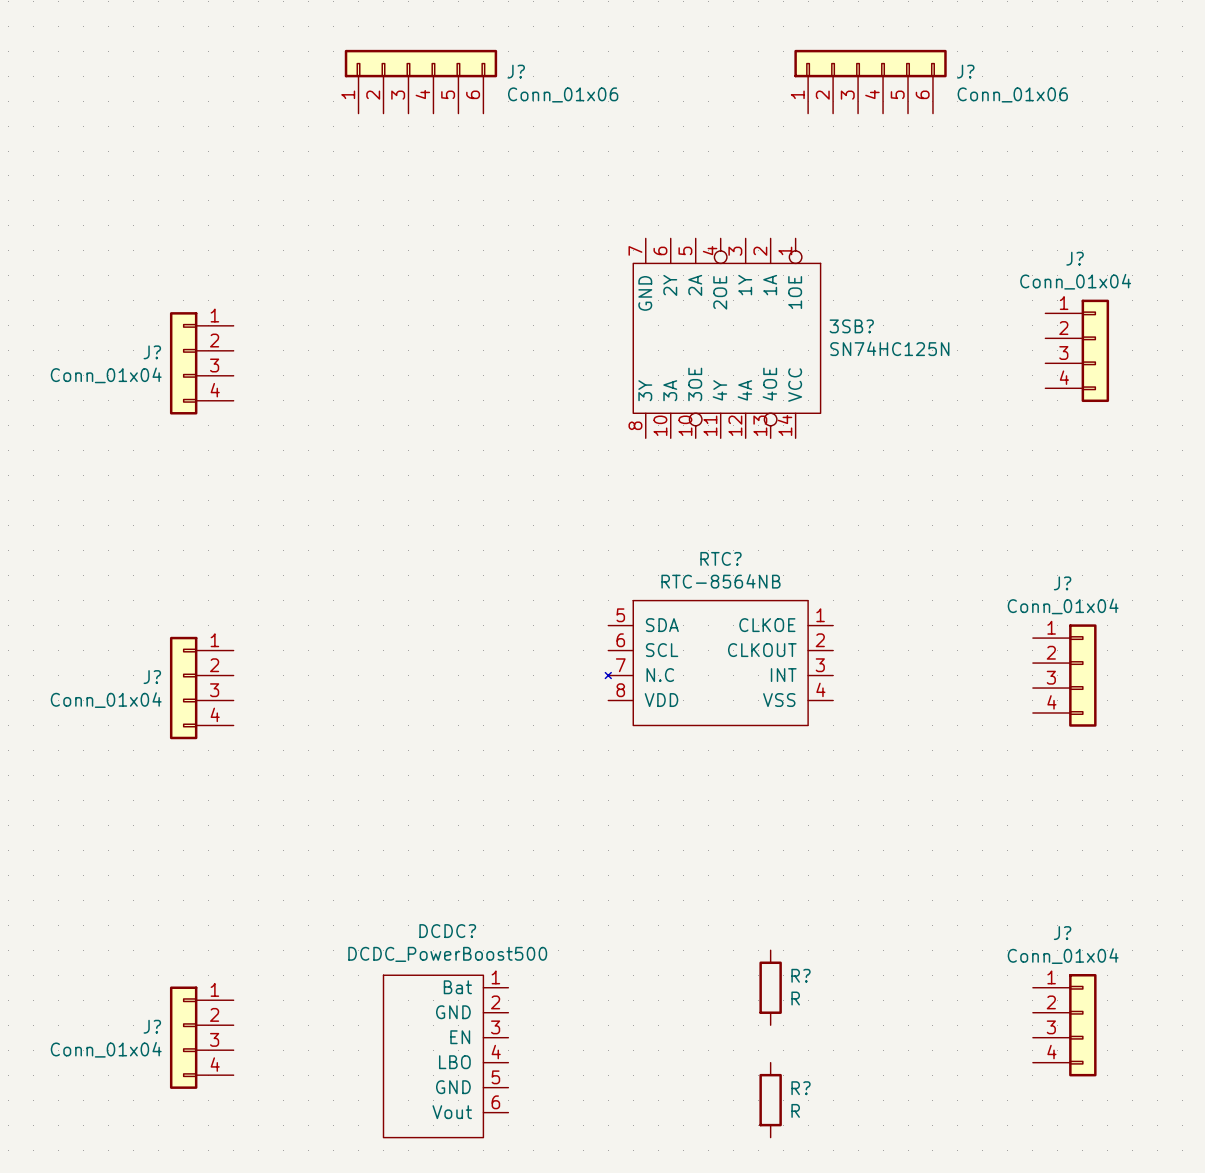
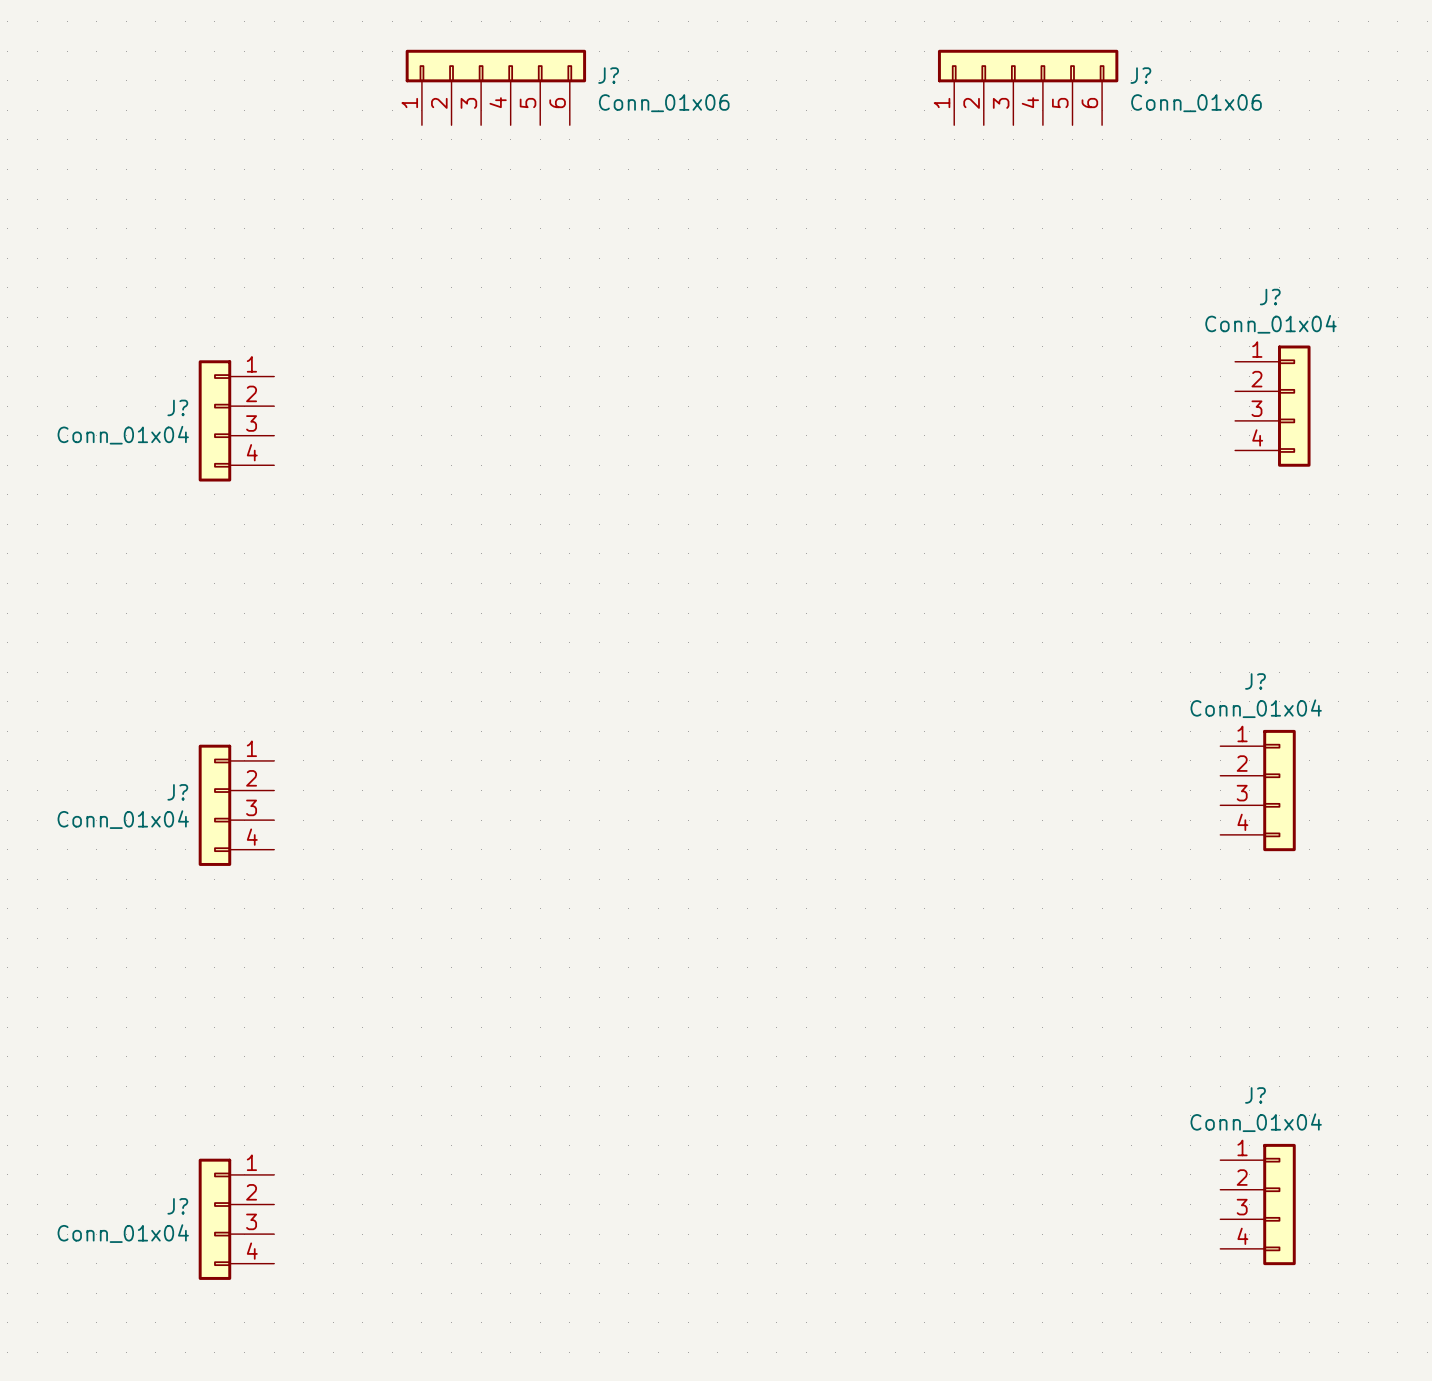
3SB?: SN74HC125N (726, 338) -> none
RTC?: RTC-8564NB (719, 663) -> none
R?: R (770, 987) -> none
DCDC?: DCDC_PowerBoost500 (445, 1056) -> none
R?: R (770, 1100) -> none

